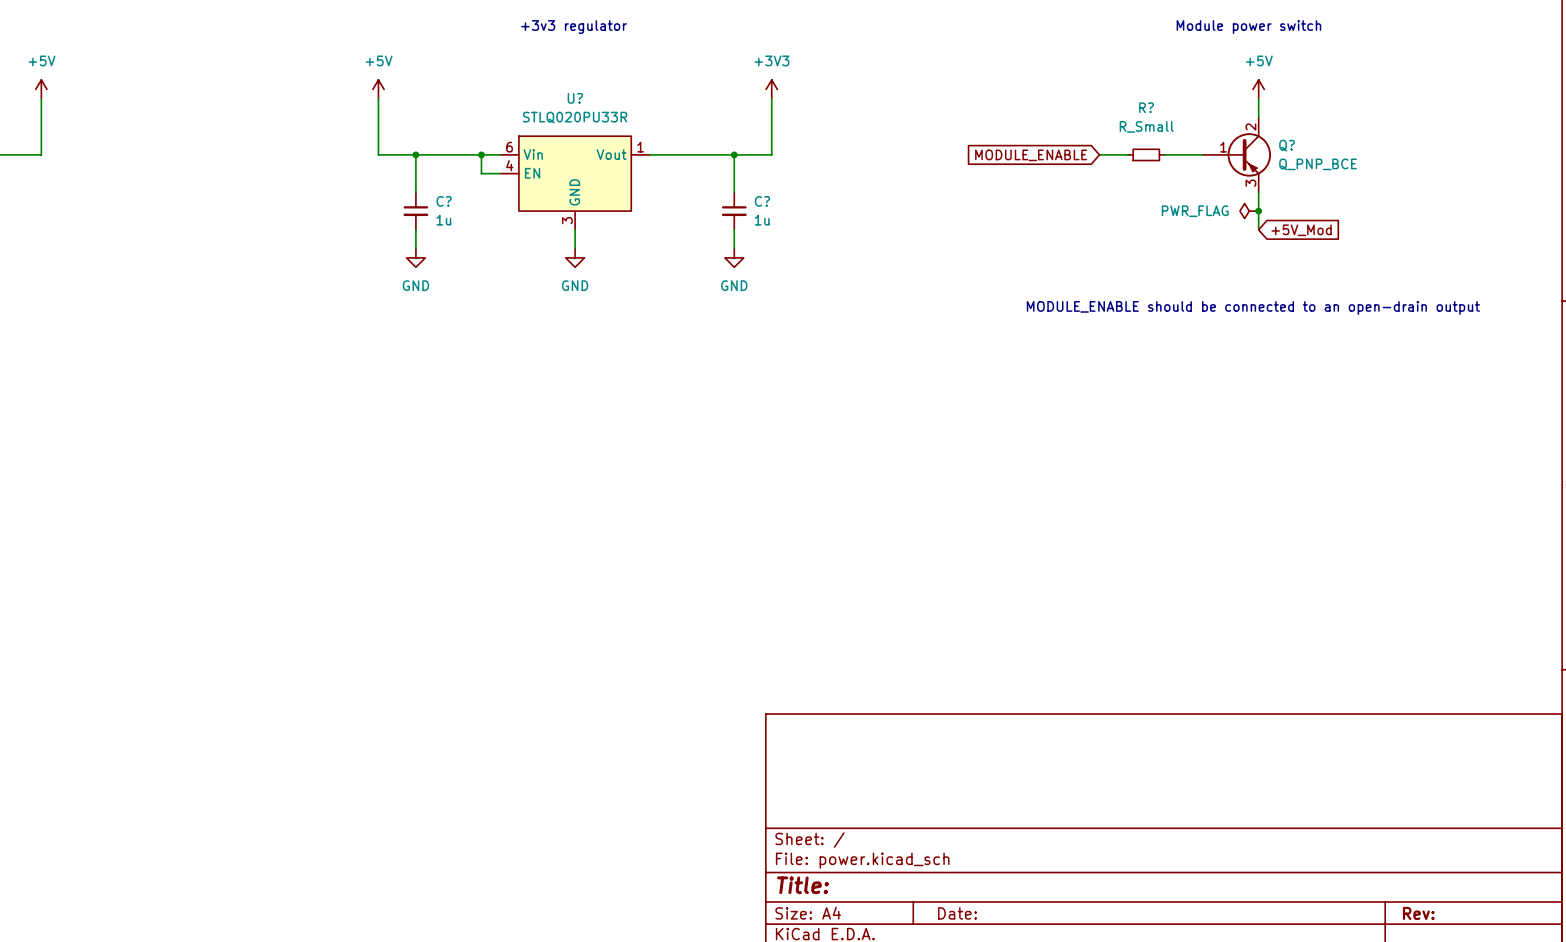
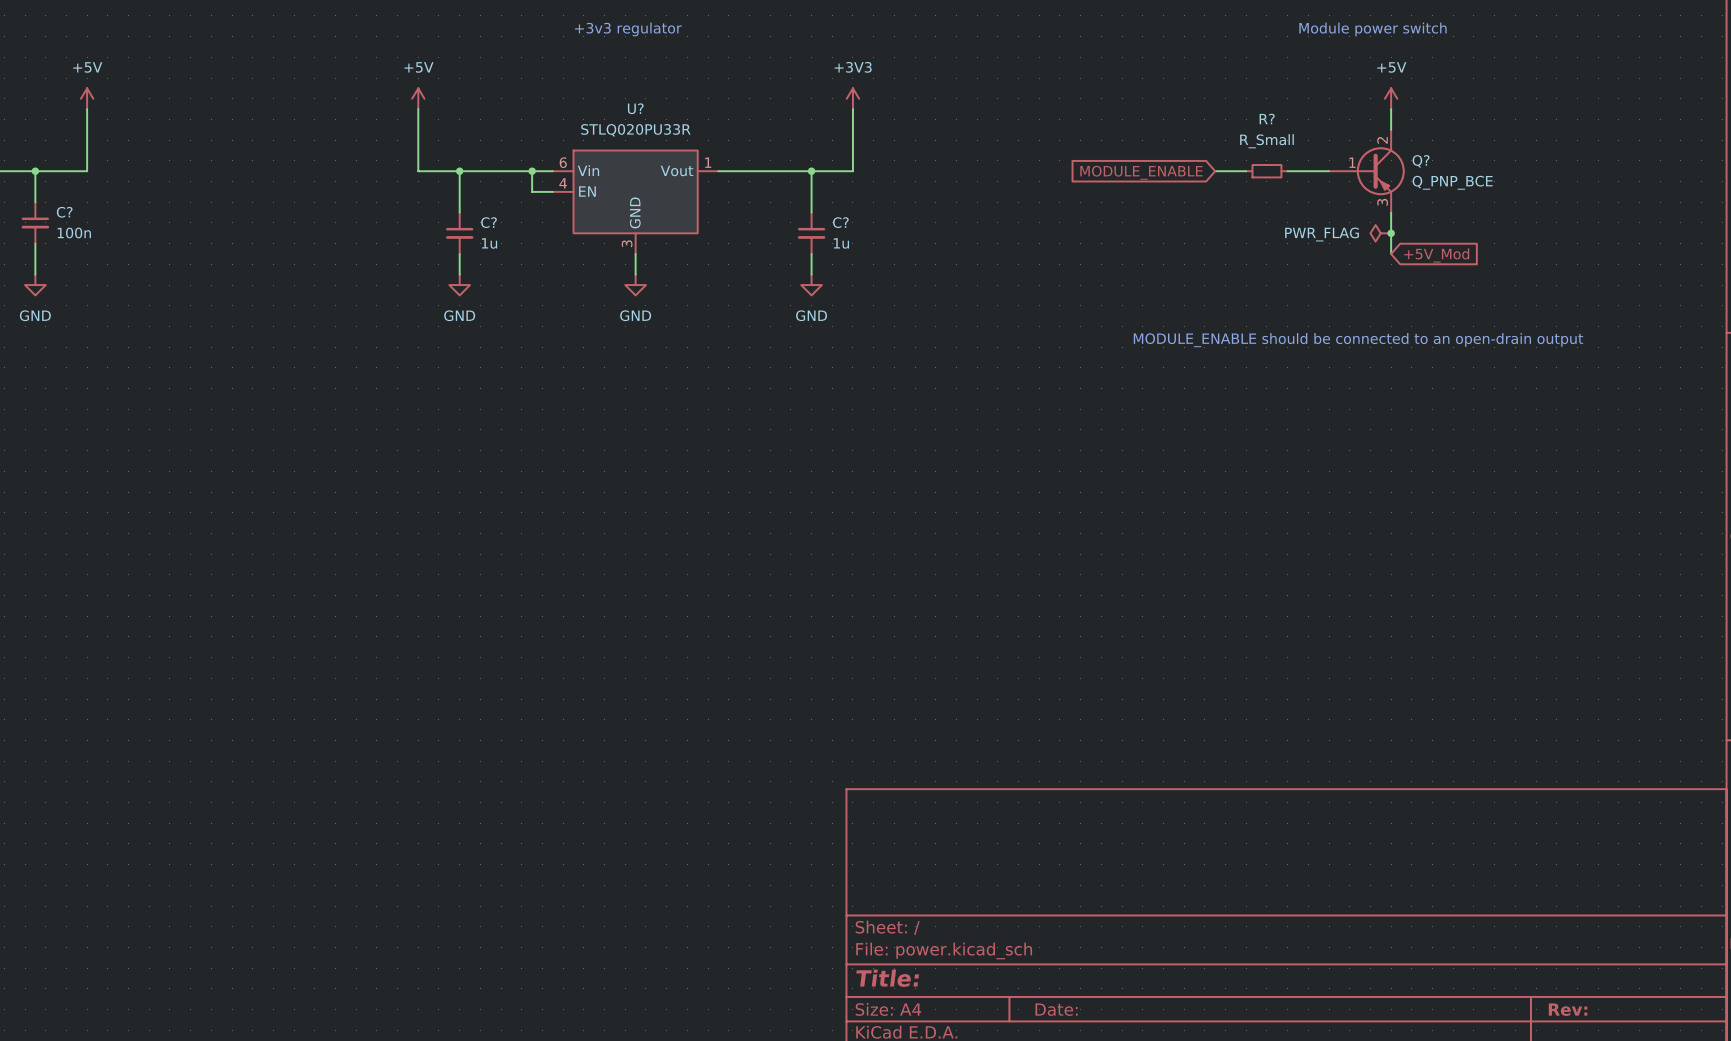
power symbol position: +5V (41, 89) -> +5V (87, 98)
wire: (41, 98) (41, 154) -> (87, 109) (87, 171) (45, 171)
wire: none -> (35, 171) (35, 202)
junction: none -> (35, 171)
C?: none -> 100n (35, 222)
wire: none -> (35, 243) (35, 274)
power symbol: none -> GND (35, 285)

